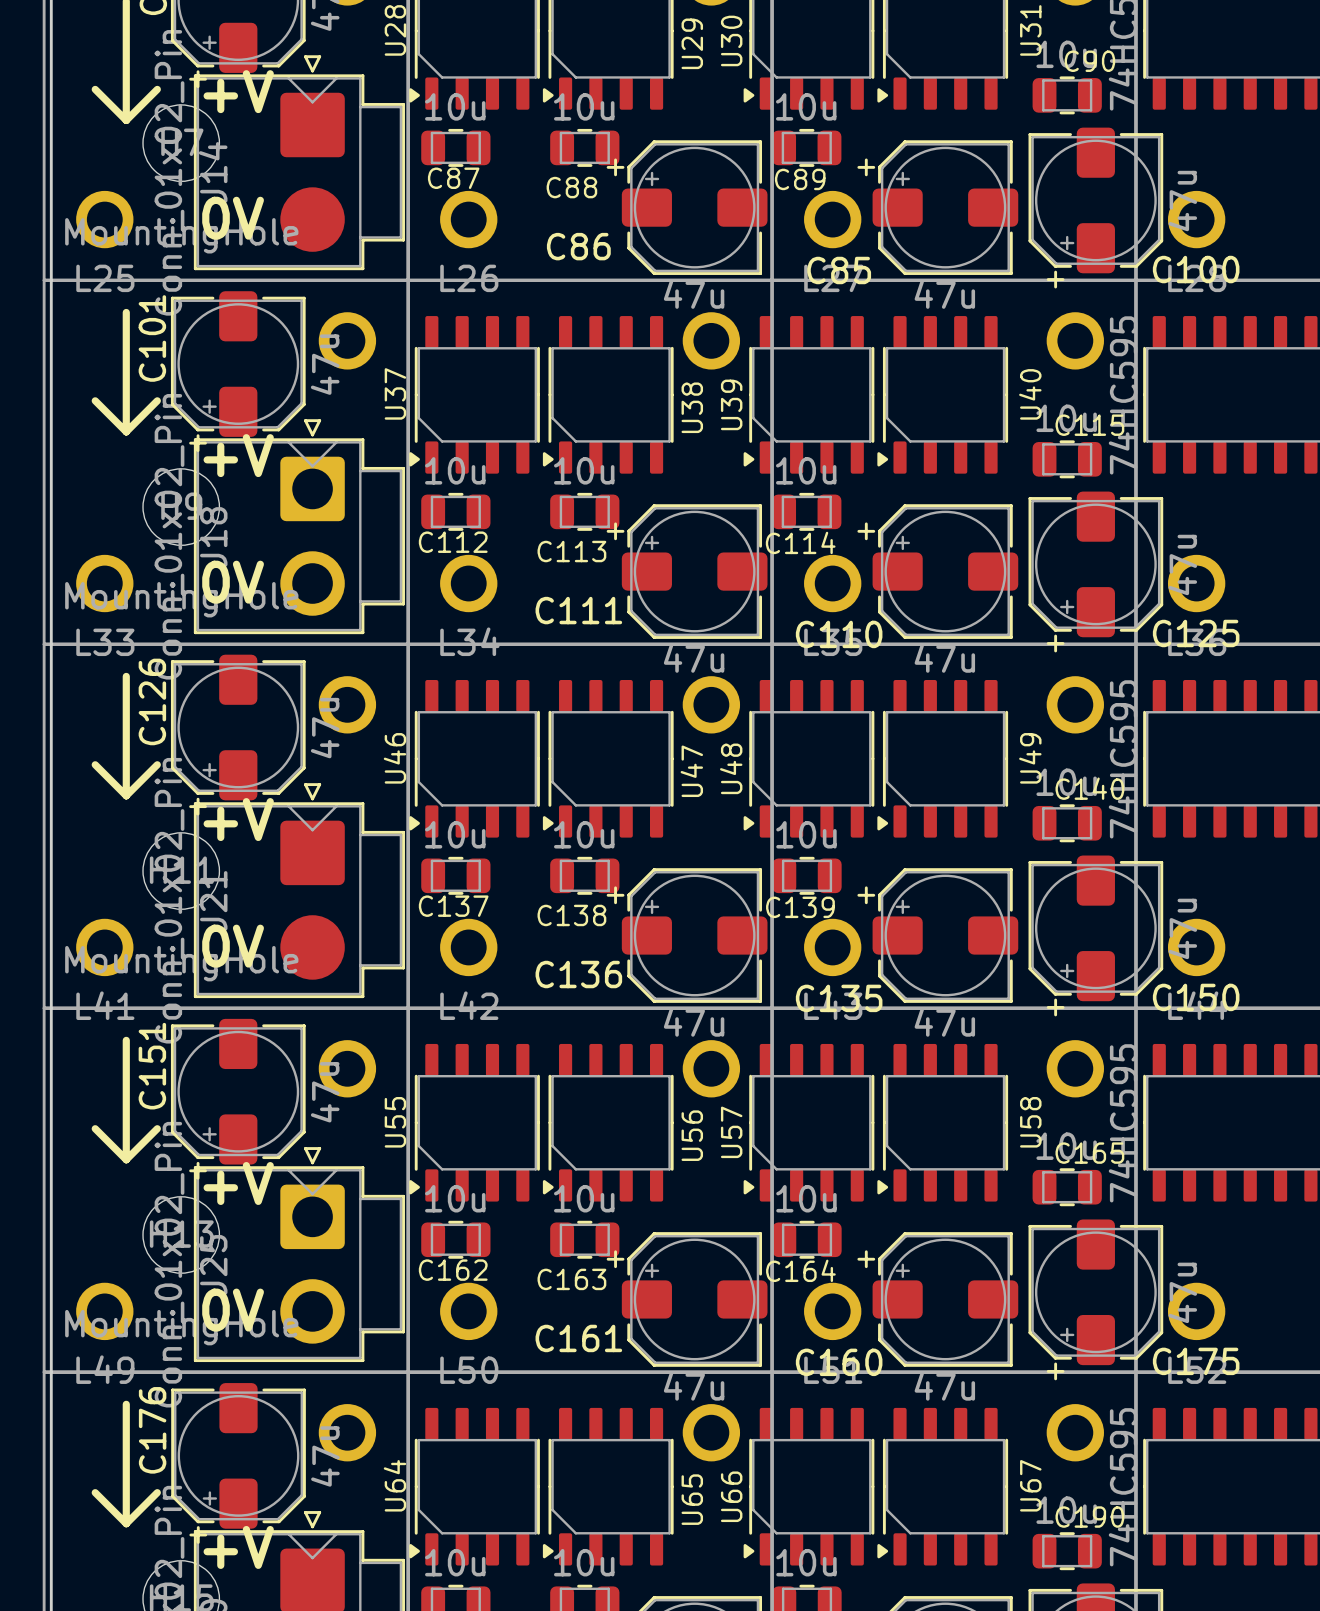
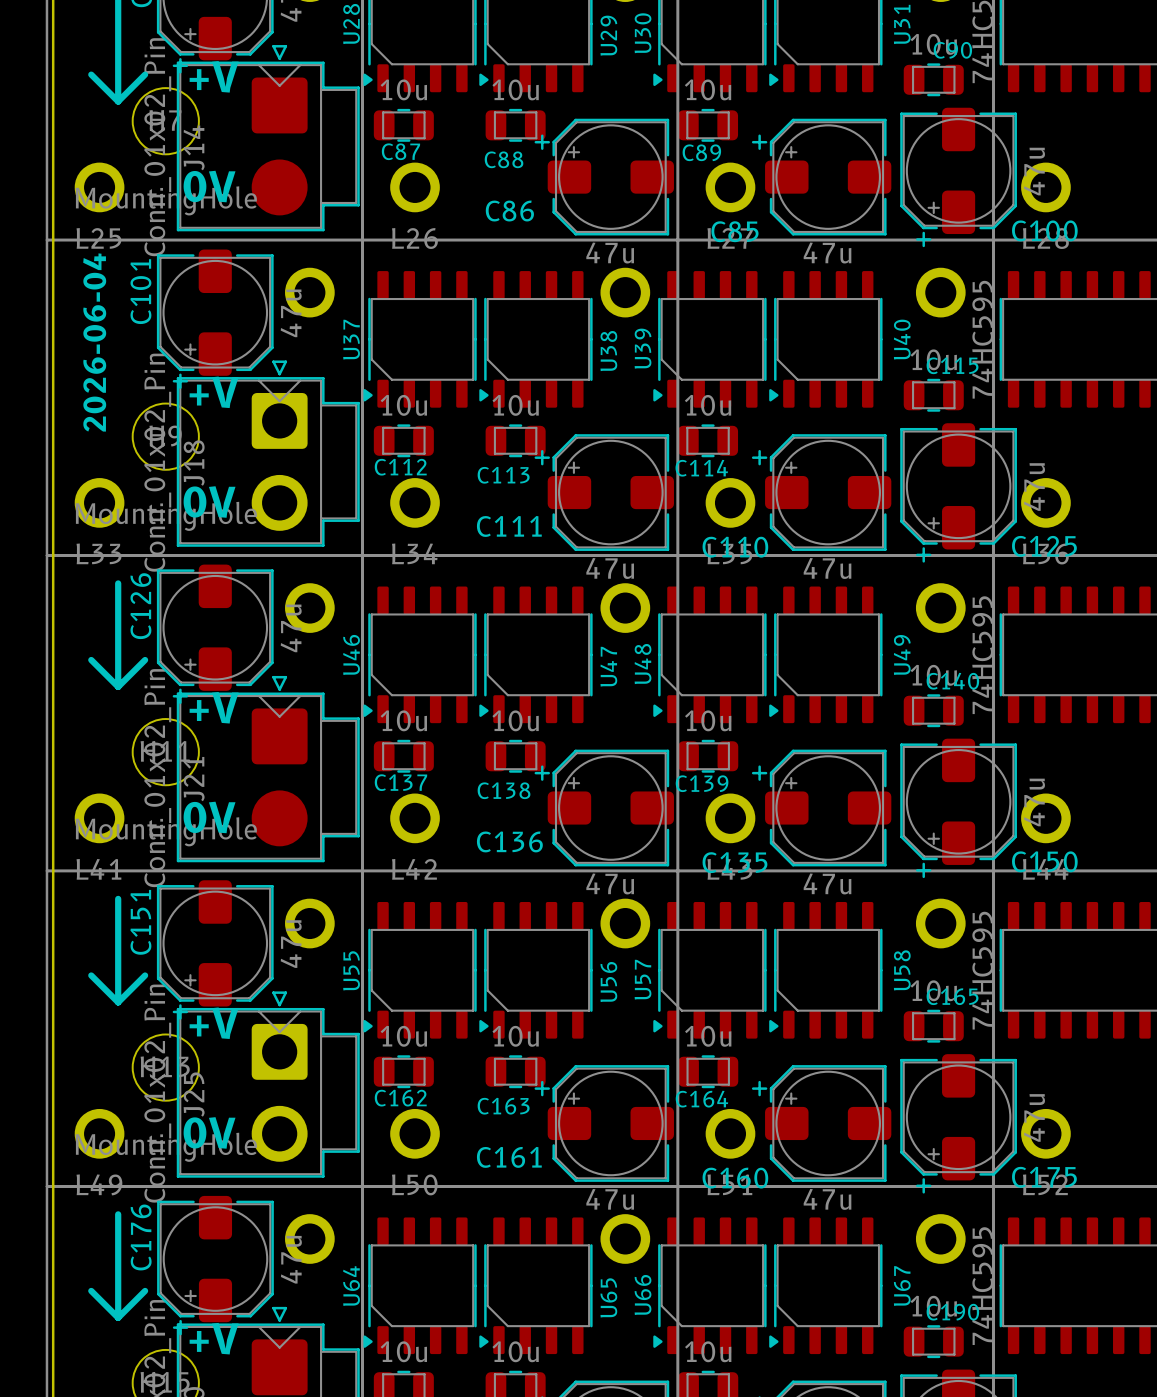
line: (126, 312) (126, 431) -> none
text: none -> 2026-06-04 (94, 342)
line: (95, 400) (126, 431) -> none
line: (157, 400) (126, 431) -> none

